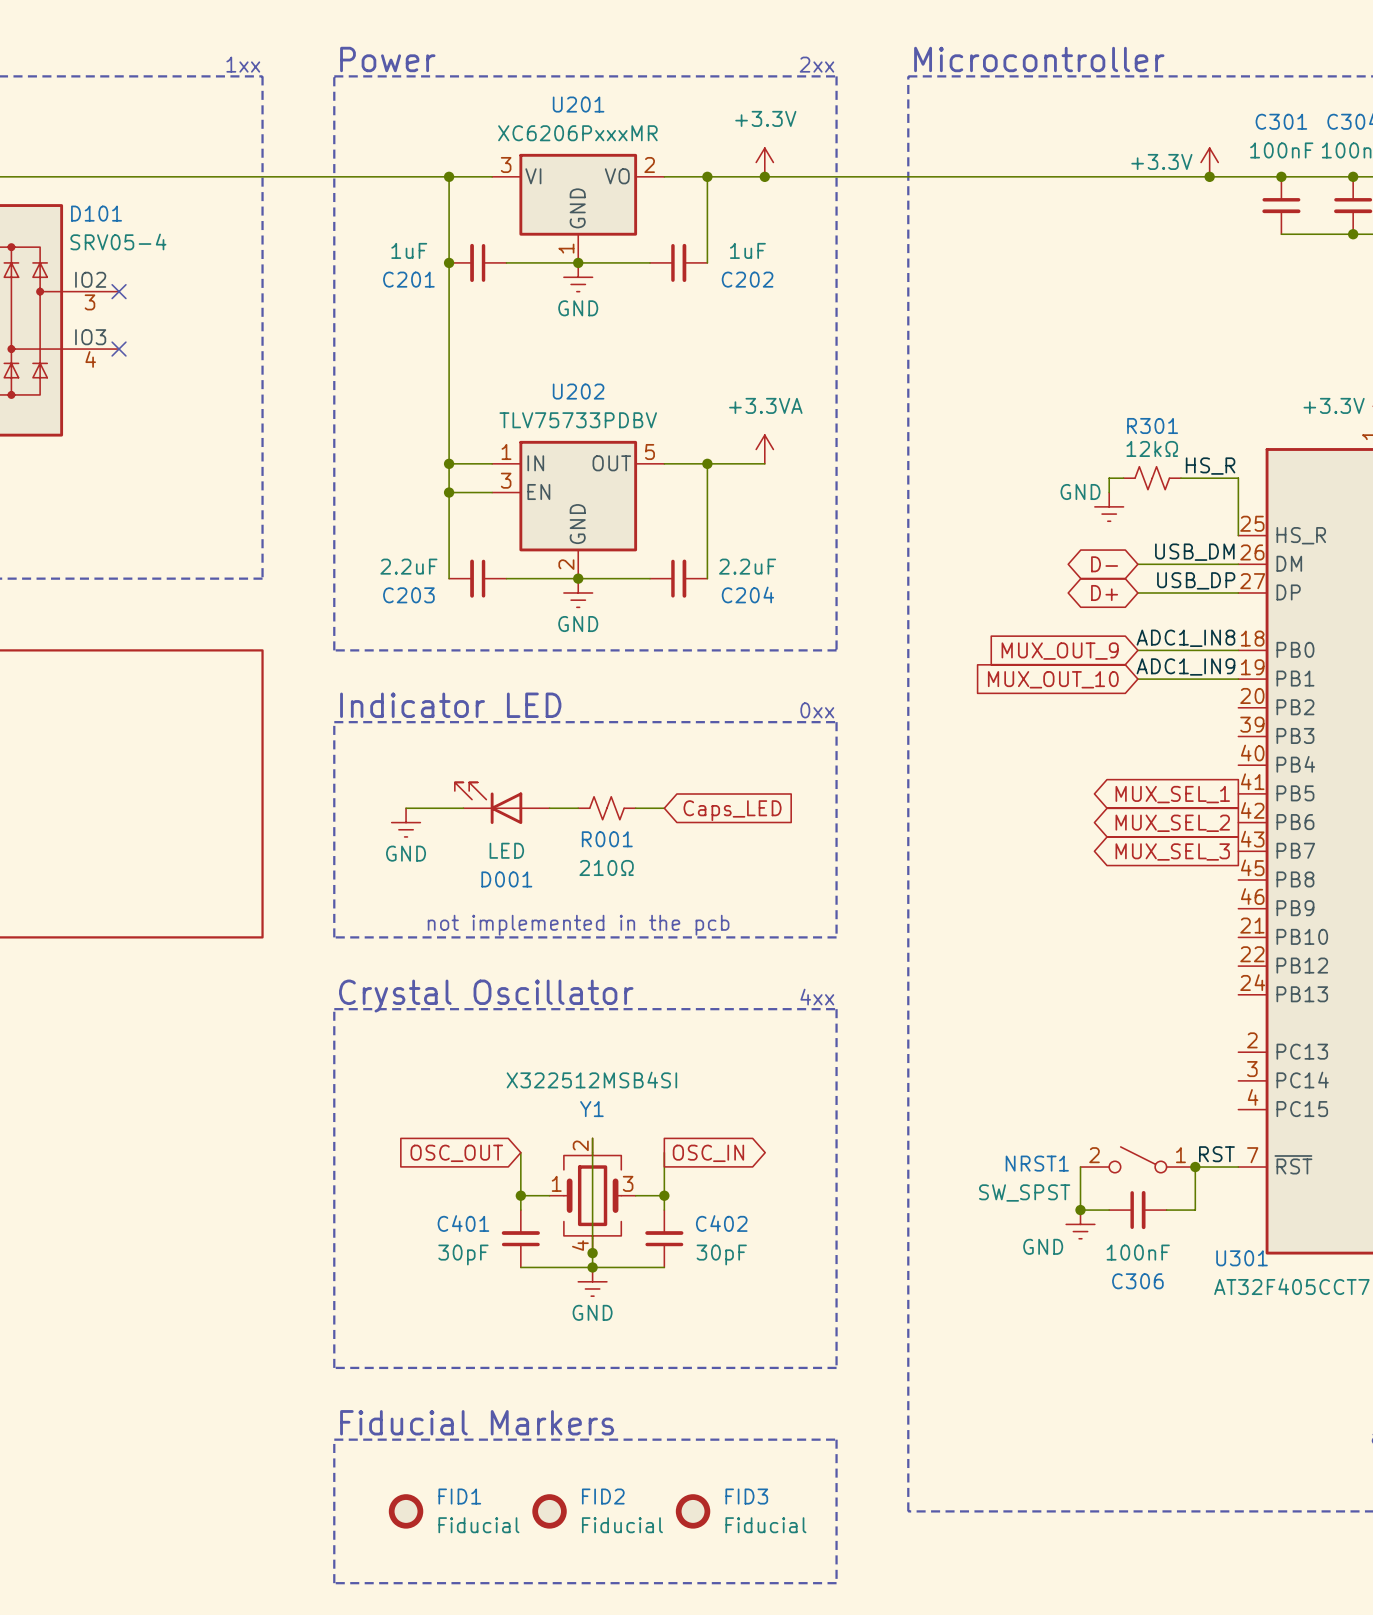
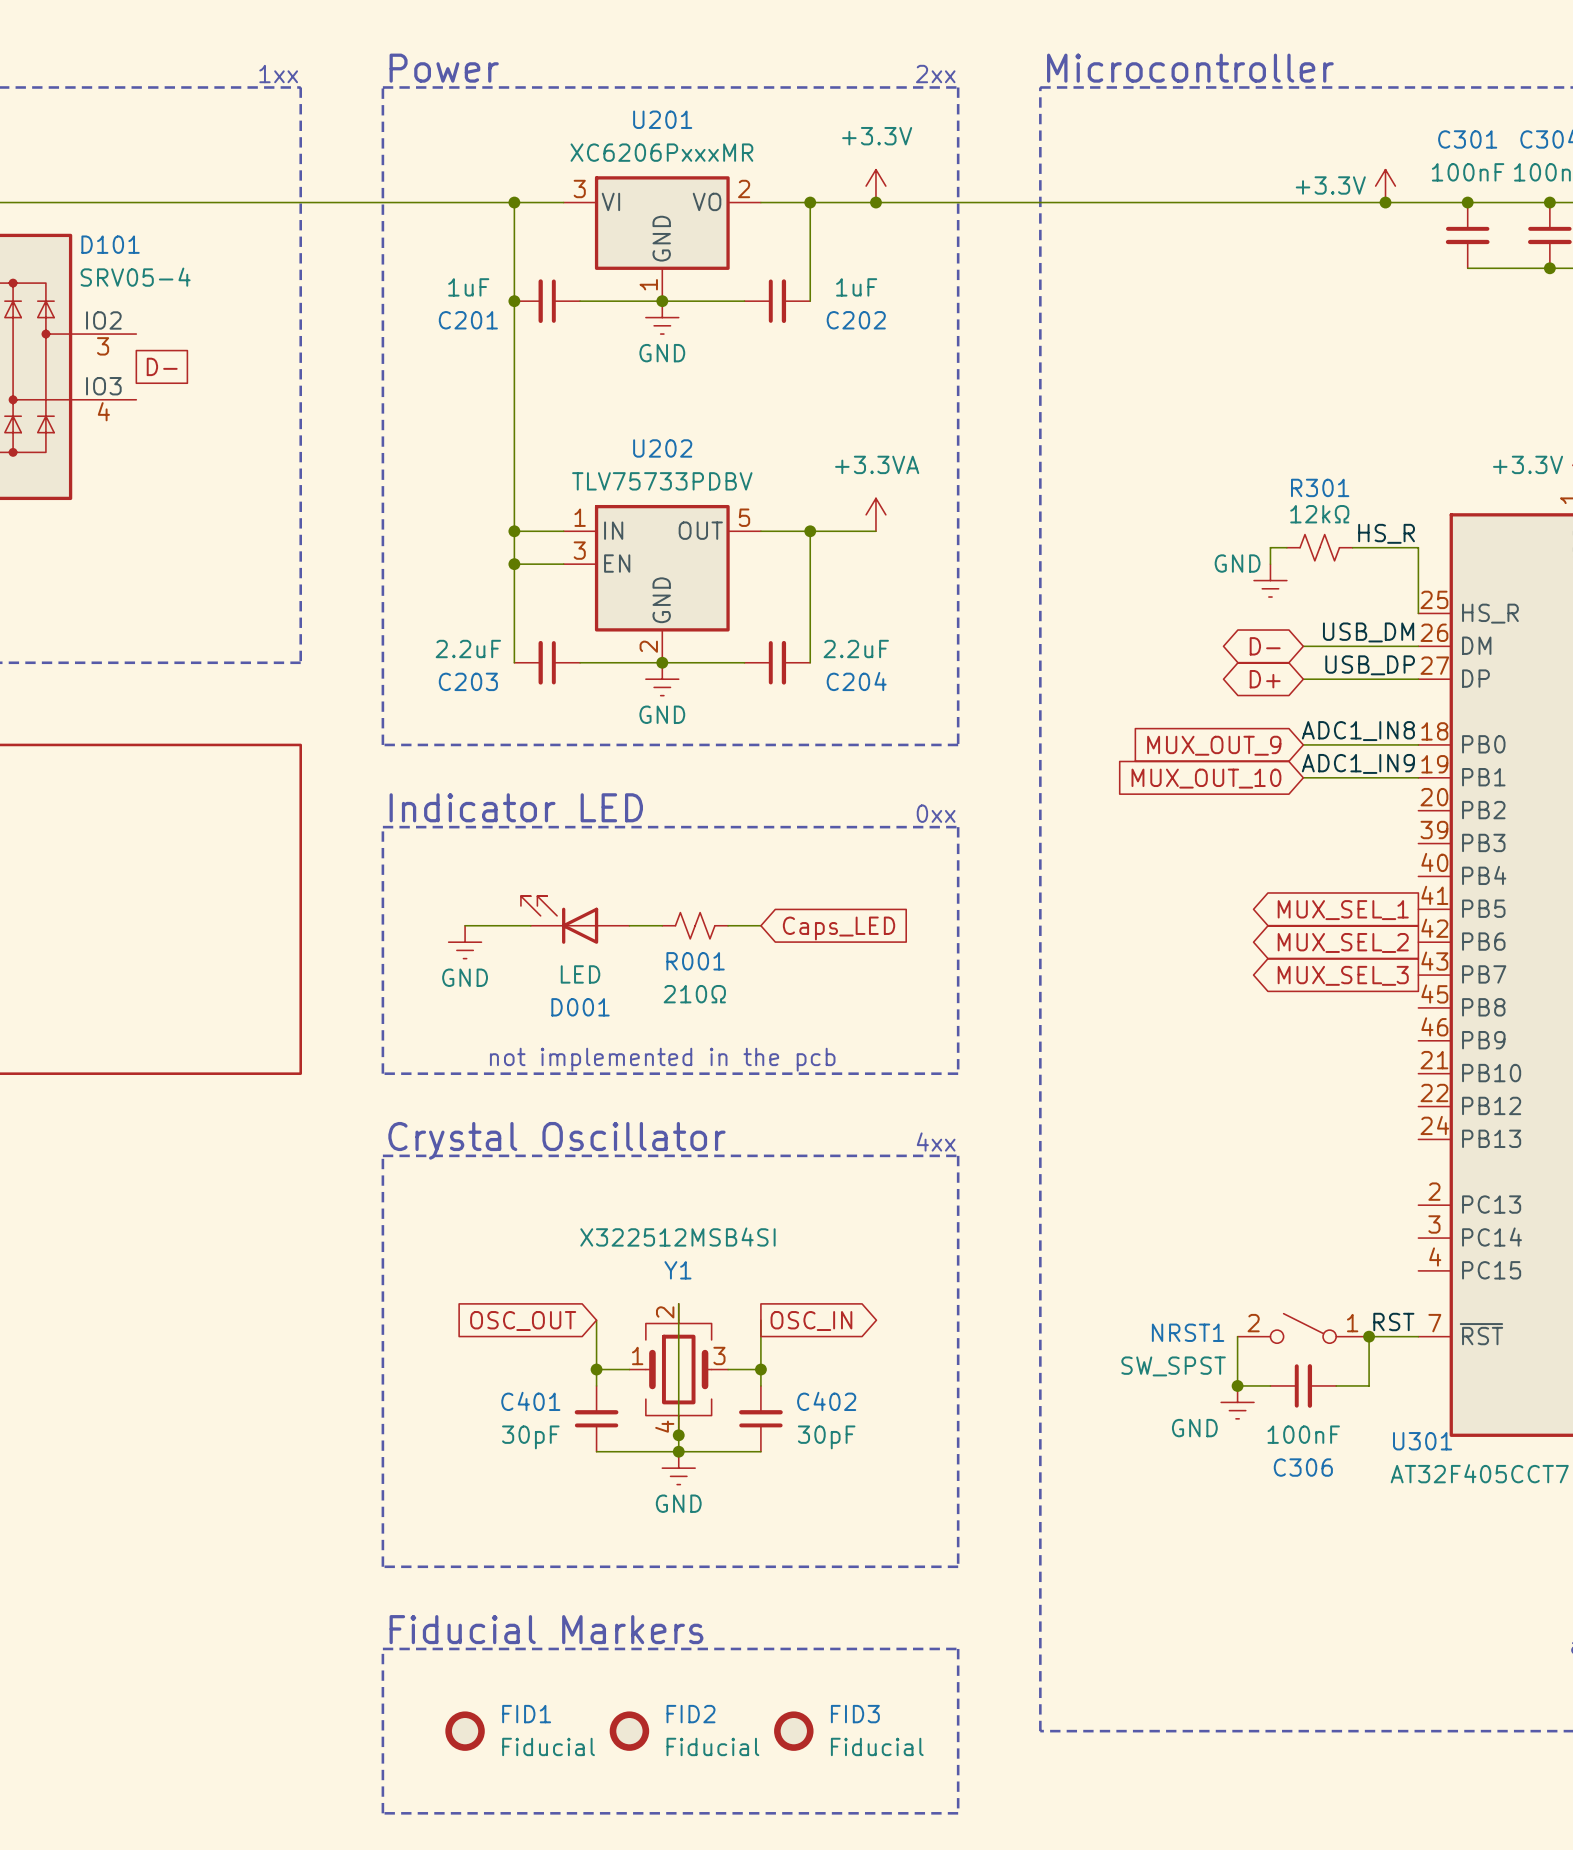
no-connect mark: (119, 291) -> none
global label: none -> D- (162, 366)
no-connect mark: (119, 349) -> none

